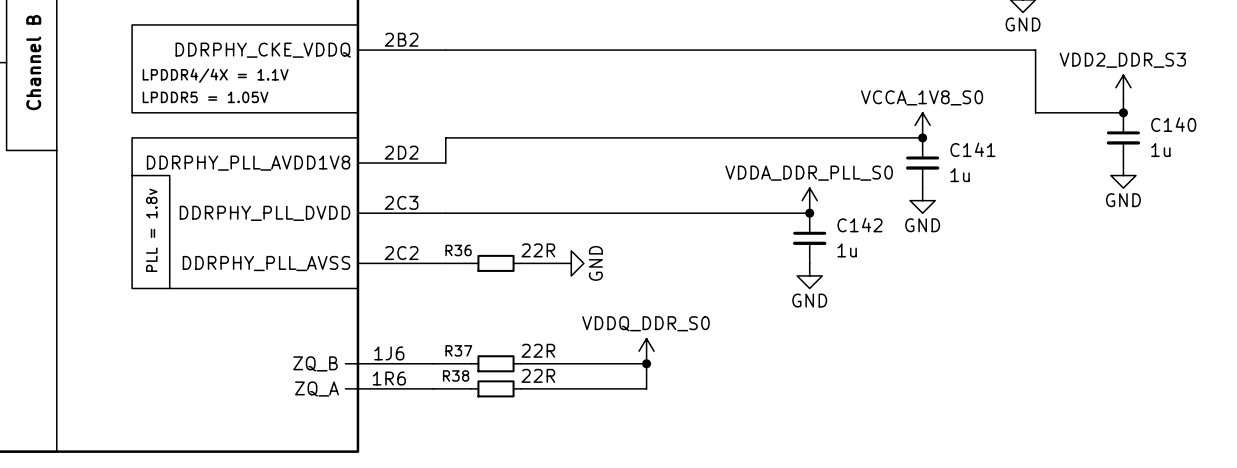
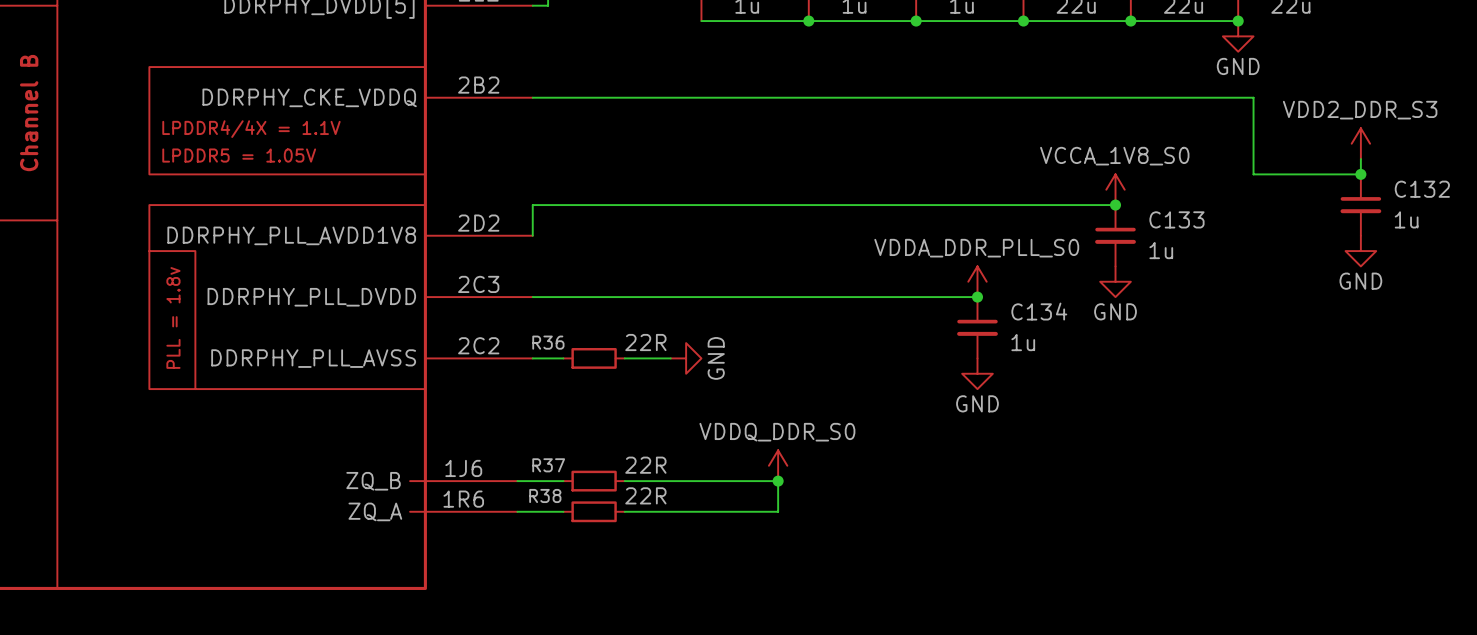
C140 name: C140 (1173, 124) -> C132 (1422, 189)
C141 name: C141 (972, 149) -> C133 (1176, 219)
C142 name: C142 (860, 225) -> C134 (1039, 311)

